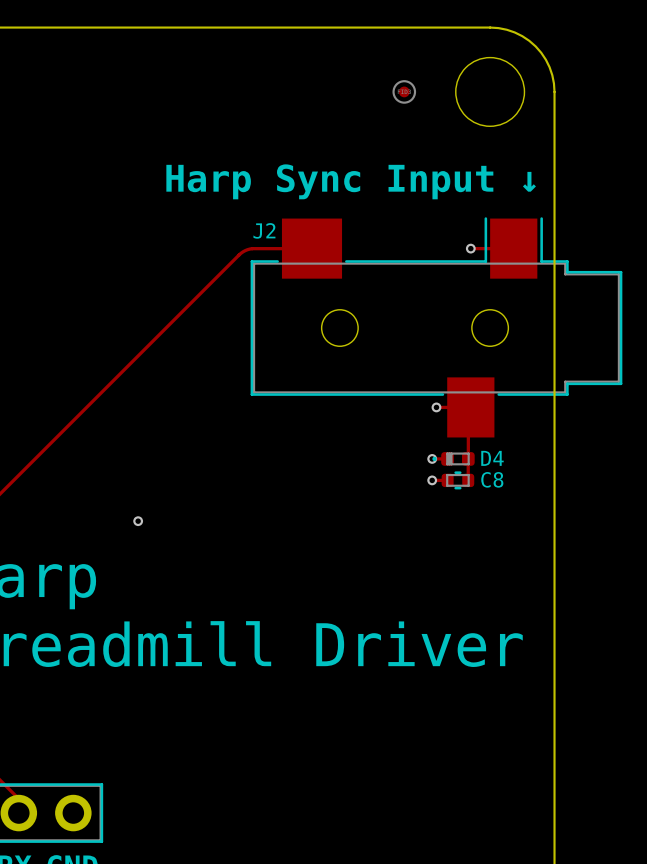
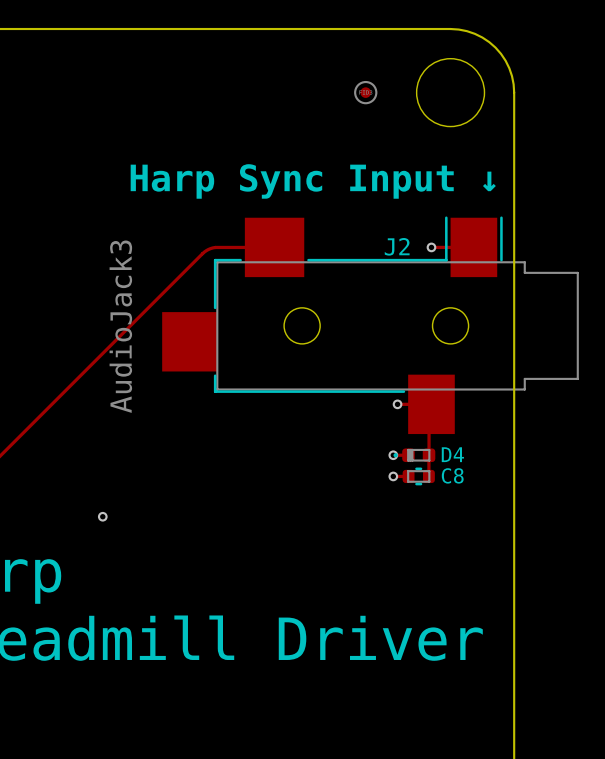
J2 footprint: [250, 217, 623, 438] -> [162, 216, 579, 435]
J2 name position: J2 (264, 230) -> J2 (397, 246)
J2 value: none -> AudioJack3 (120, 326)

